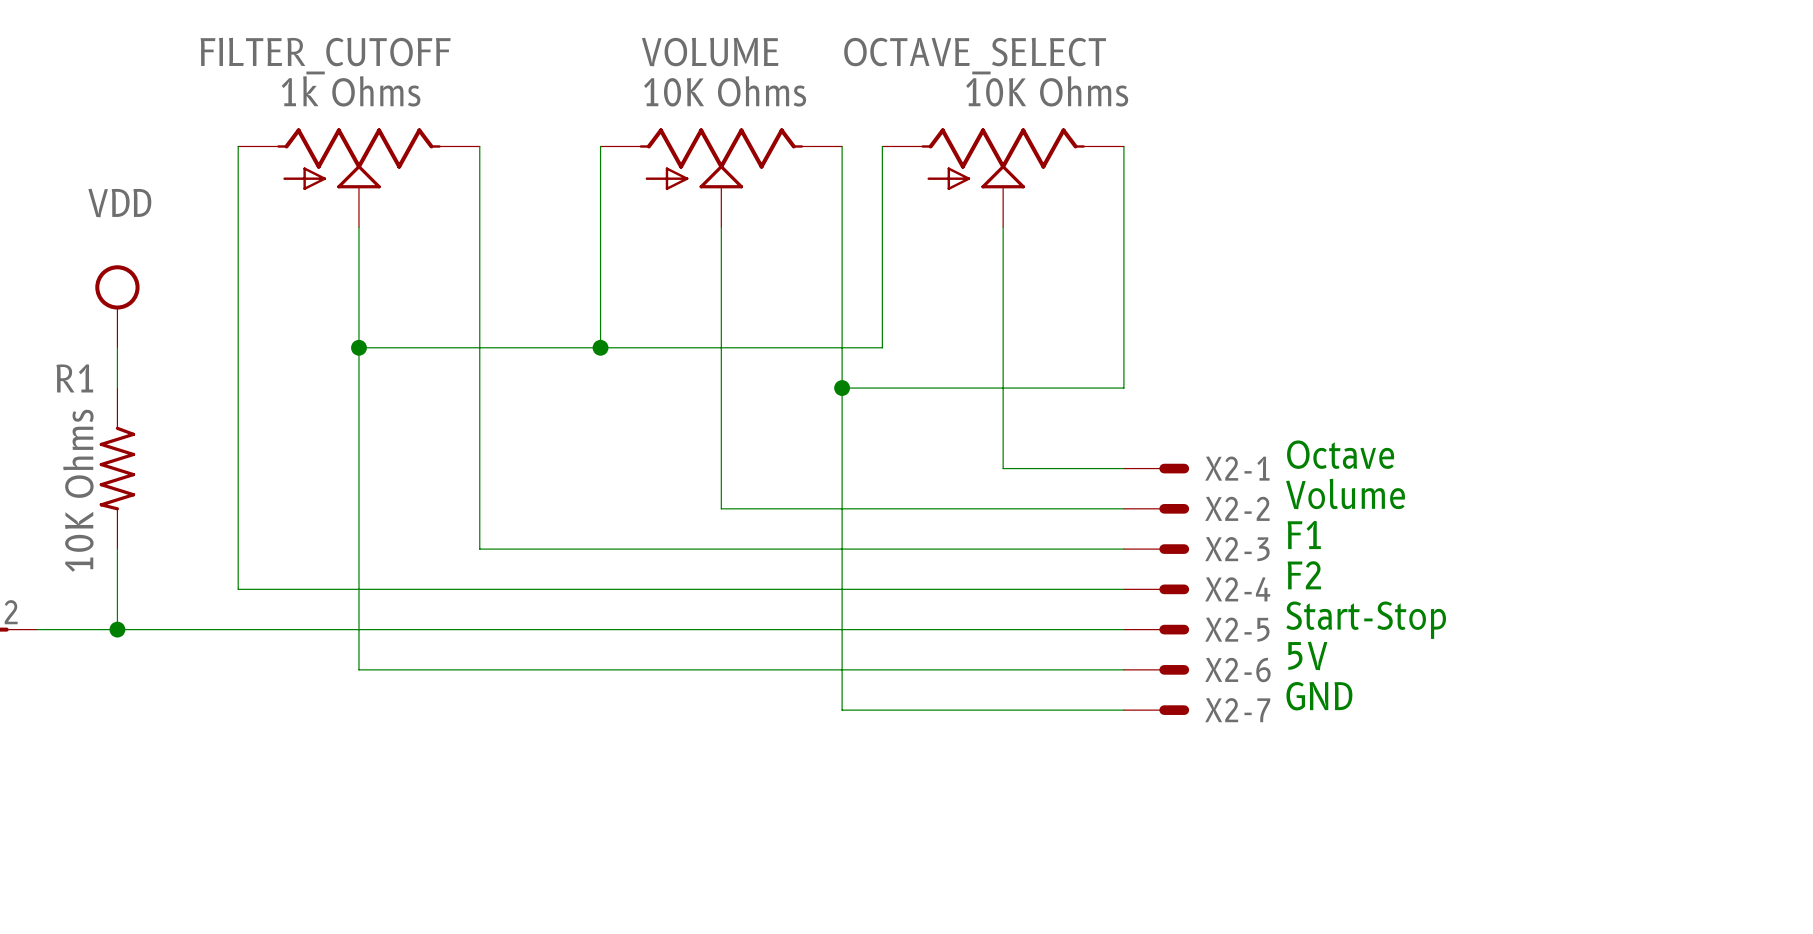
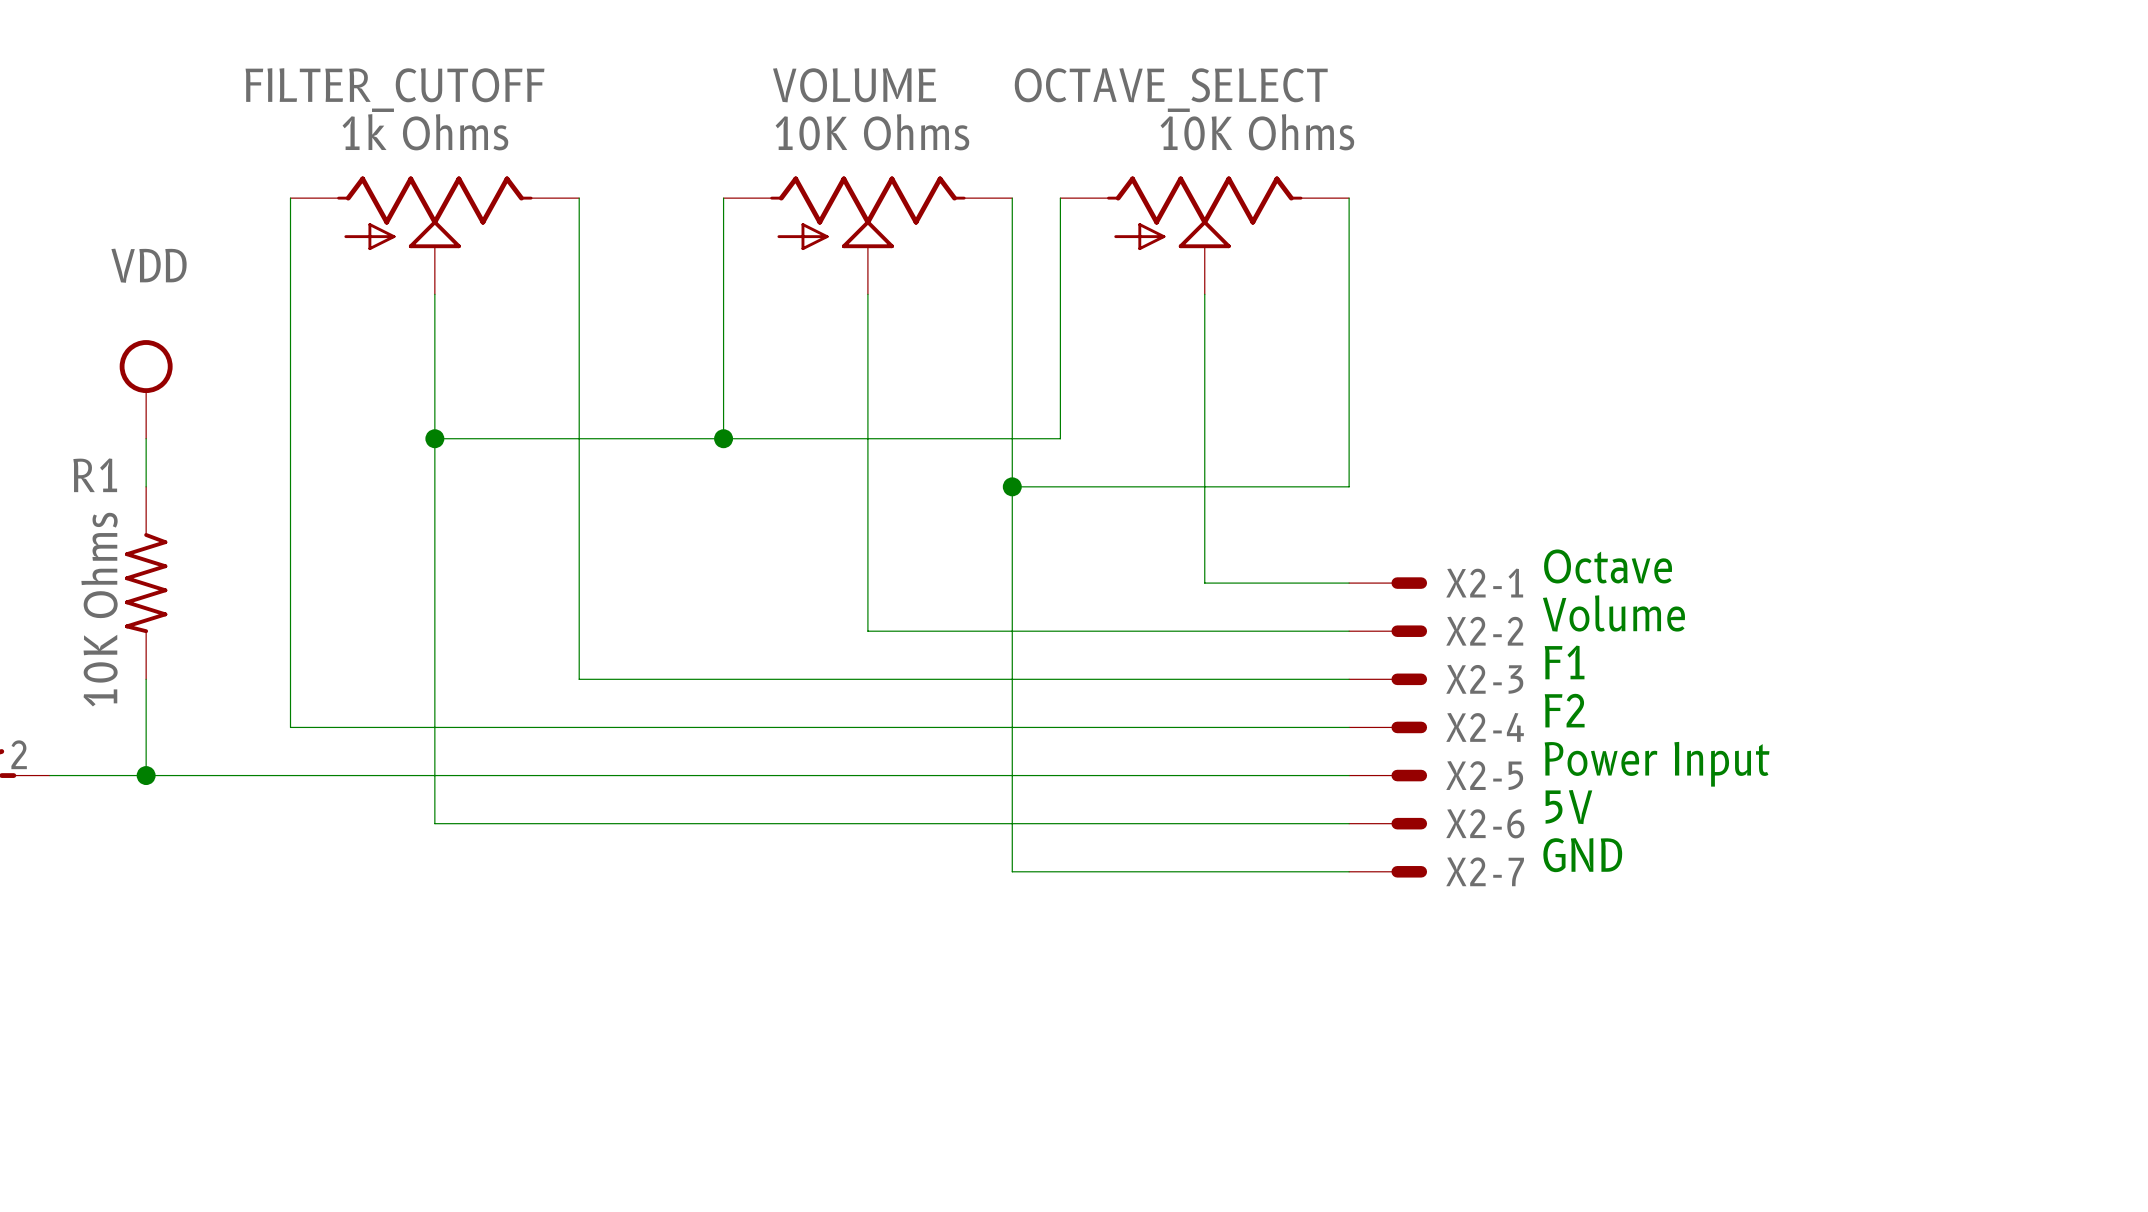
text: Start-Stop (1366, 620) -> Power Input (1657, 764)

